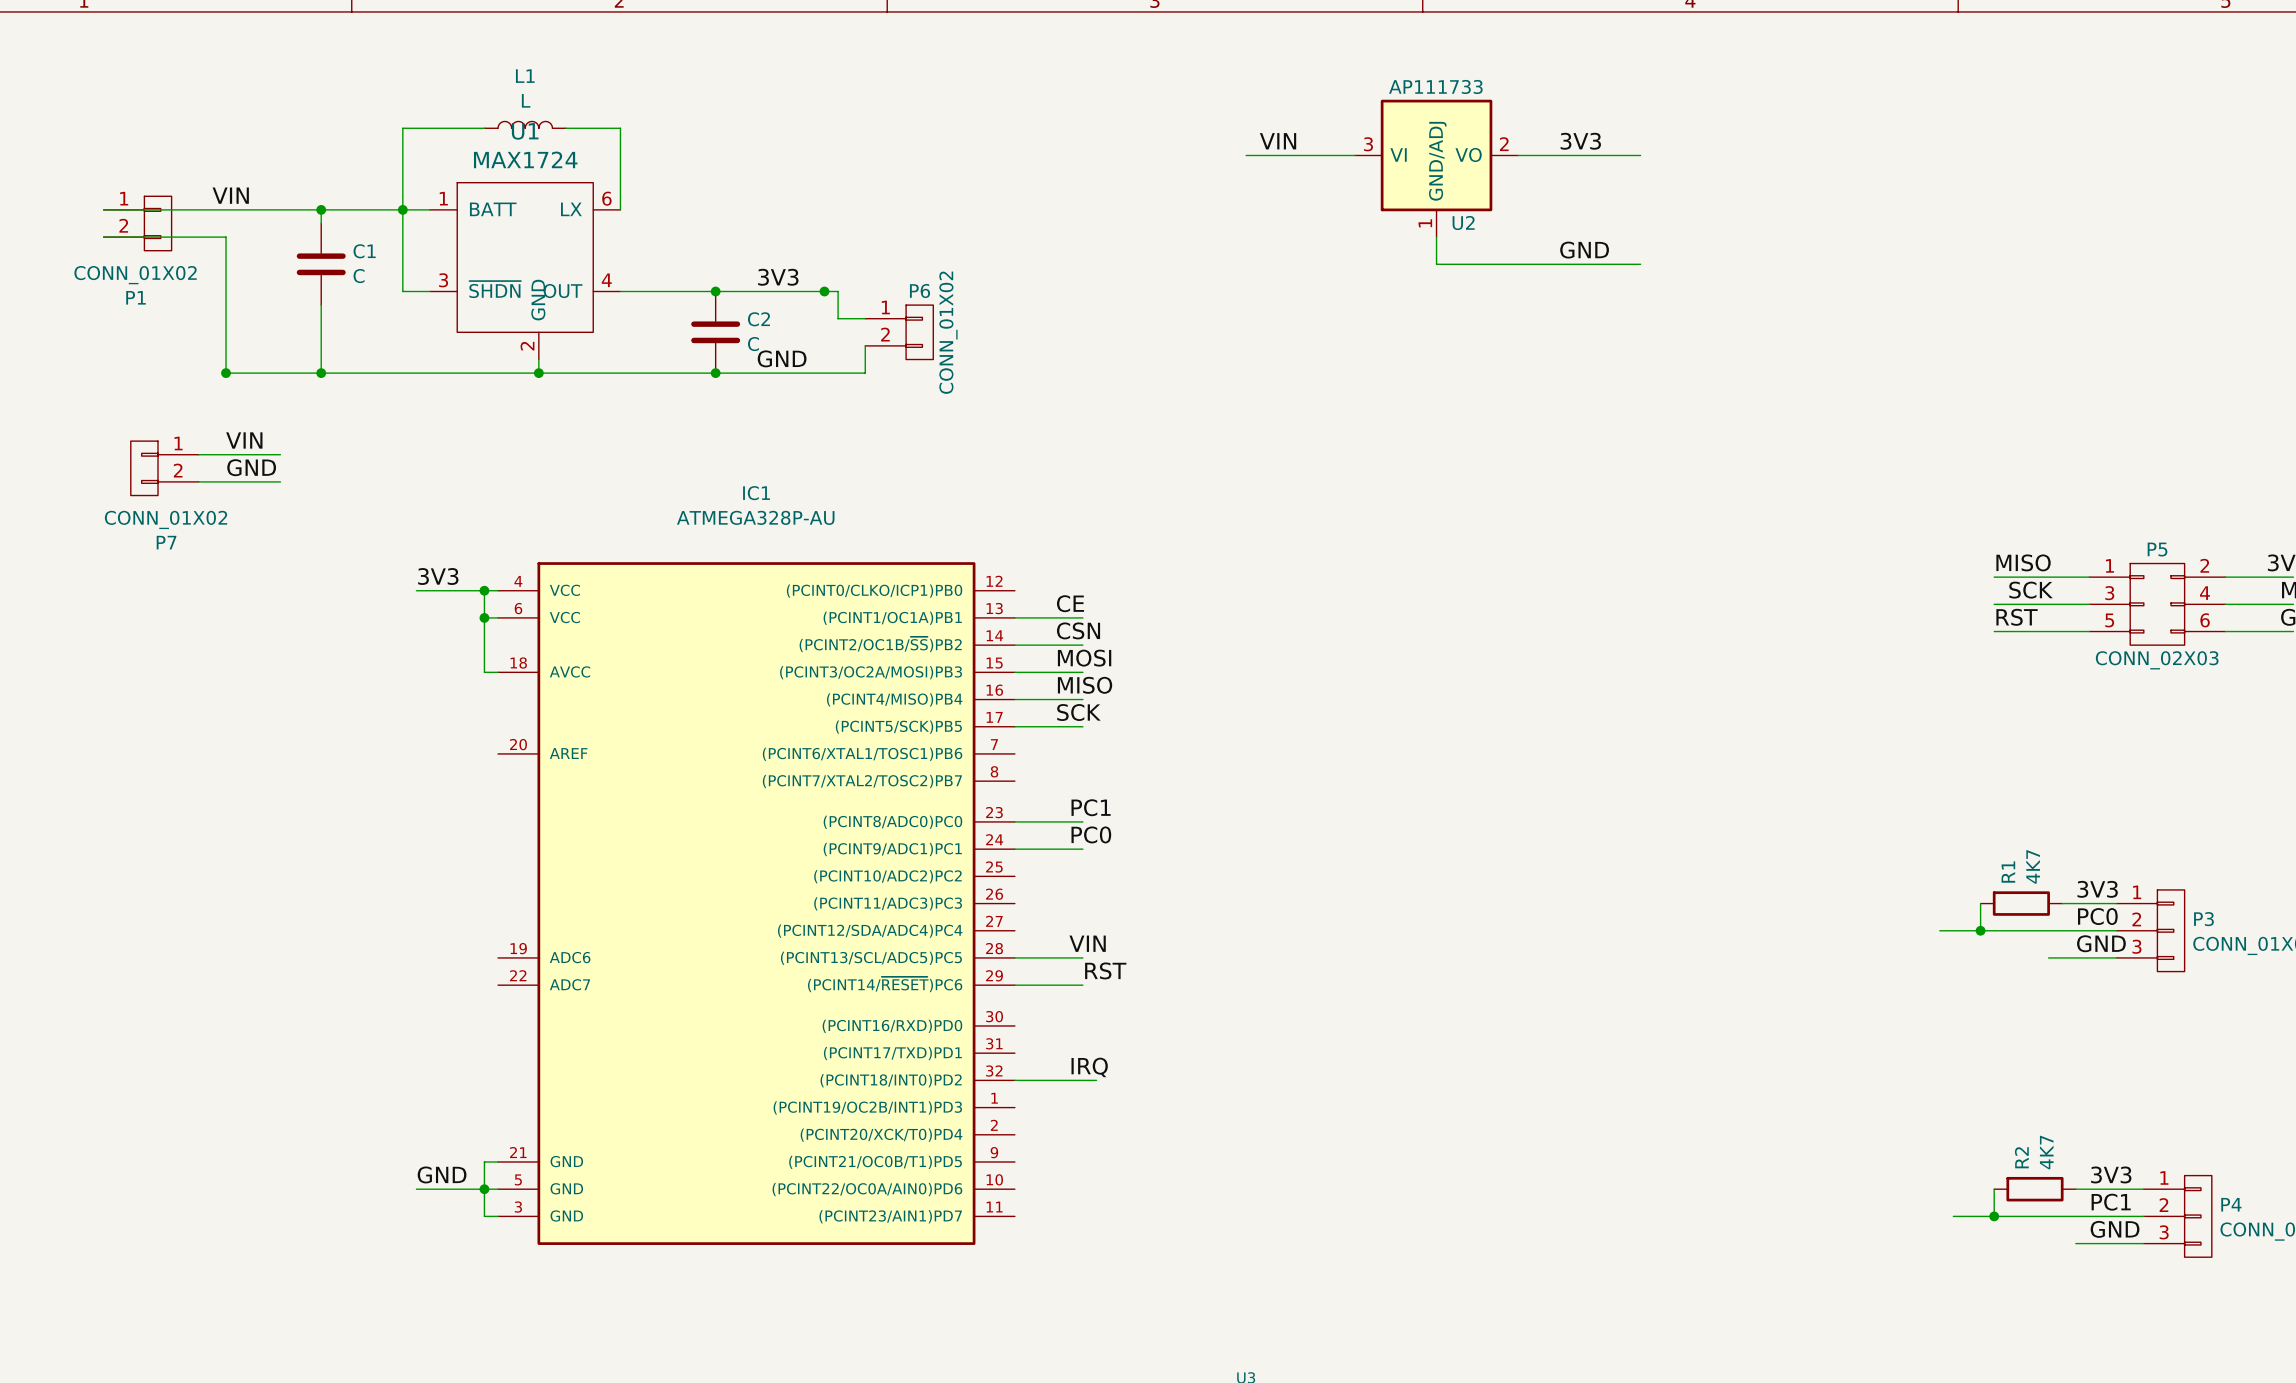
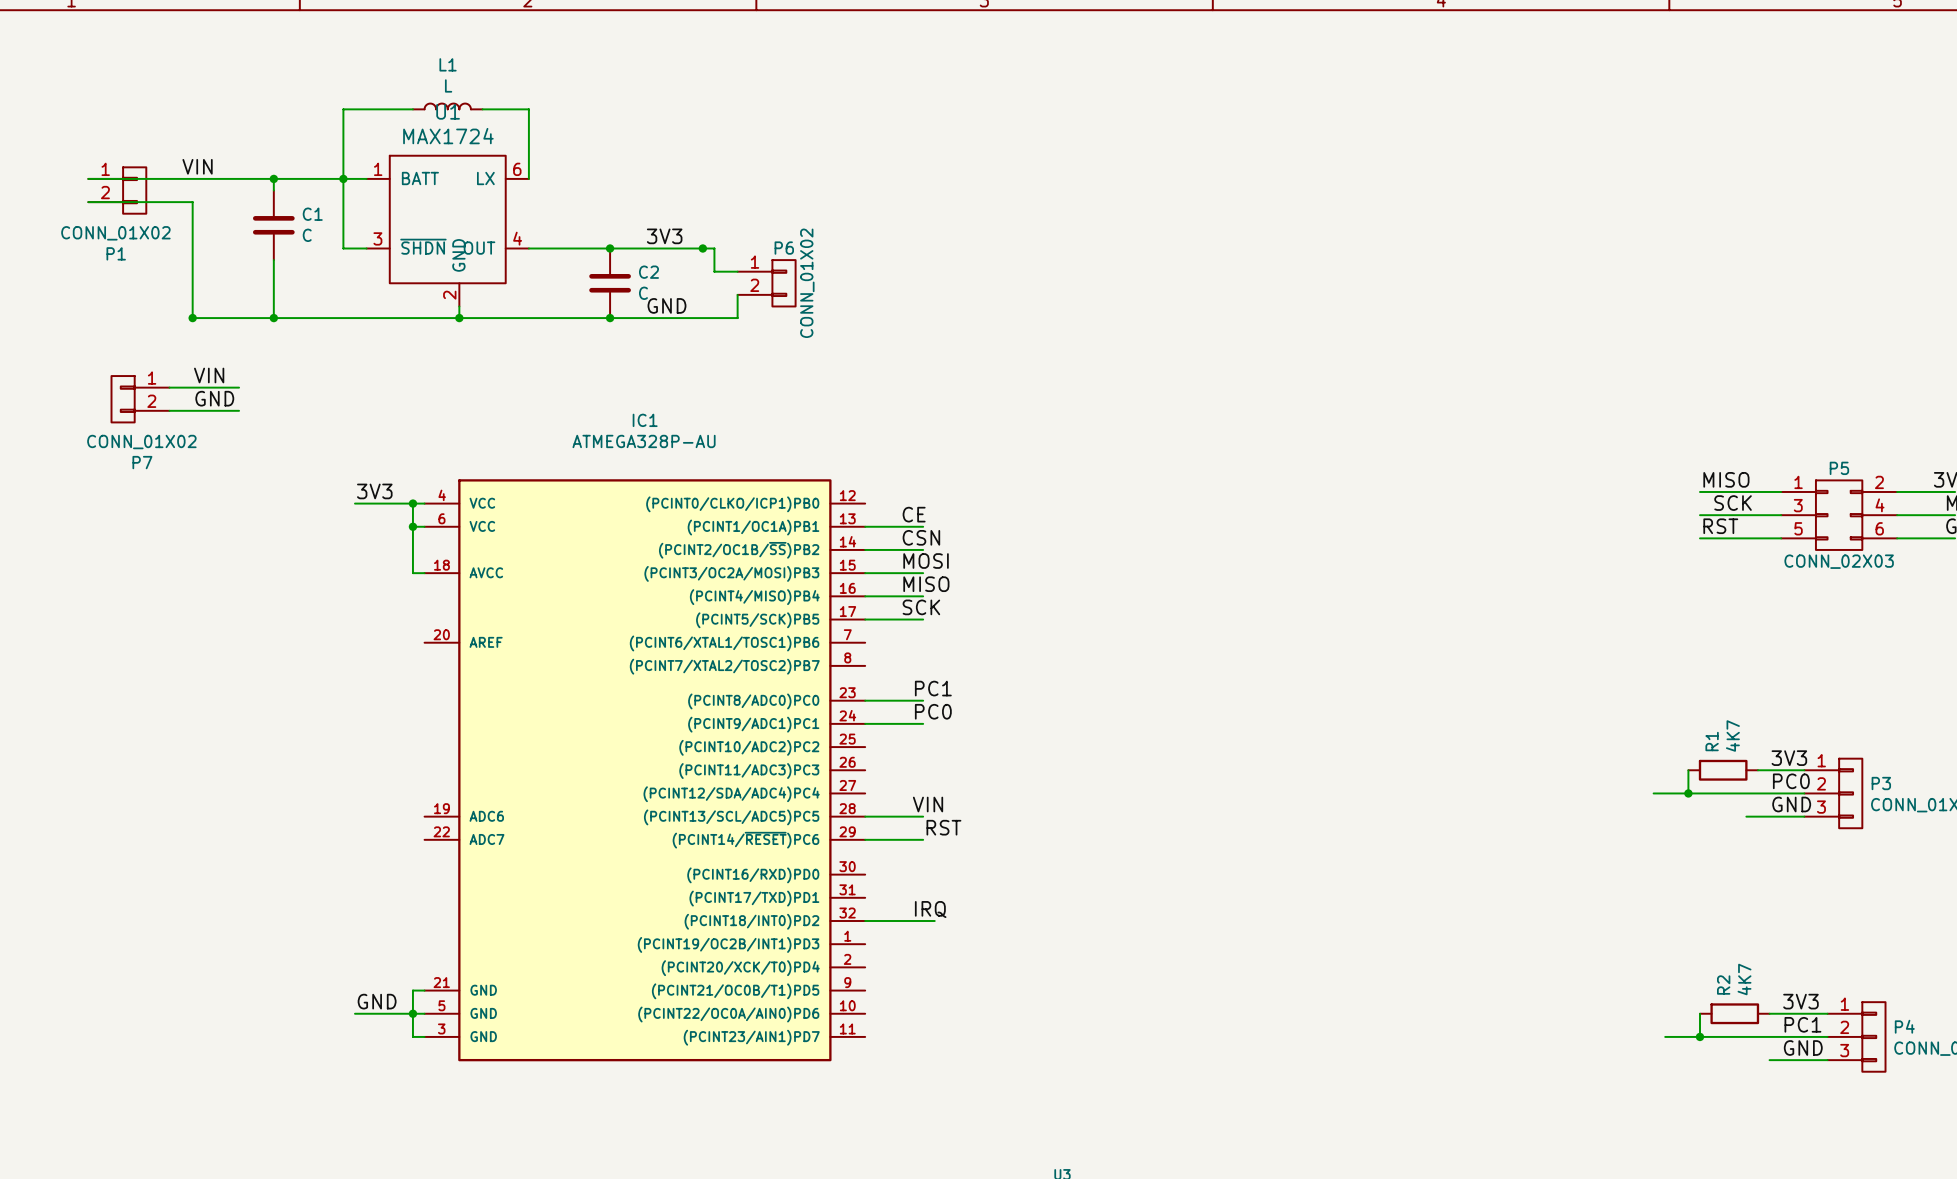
label: VIN (1278, 141) -> none
label: 3V3 (1580, 141) -> none
wire: (1246, 155) (1354, 155) -> none
wire: (1518, 155) (1640, 155) -> none
U2: AP111733 (1436, 168) -> none
wire: (1436, 237) (1436, 264) (1640, 264) -> none
label: GND (1584, 250) -> none

